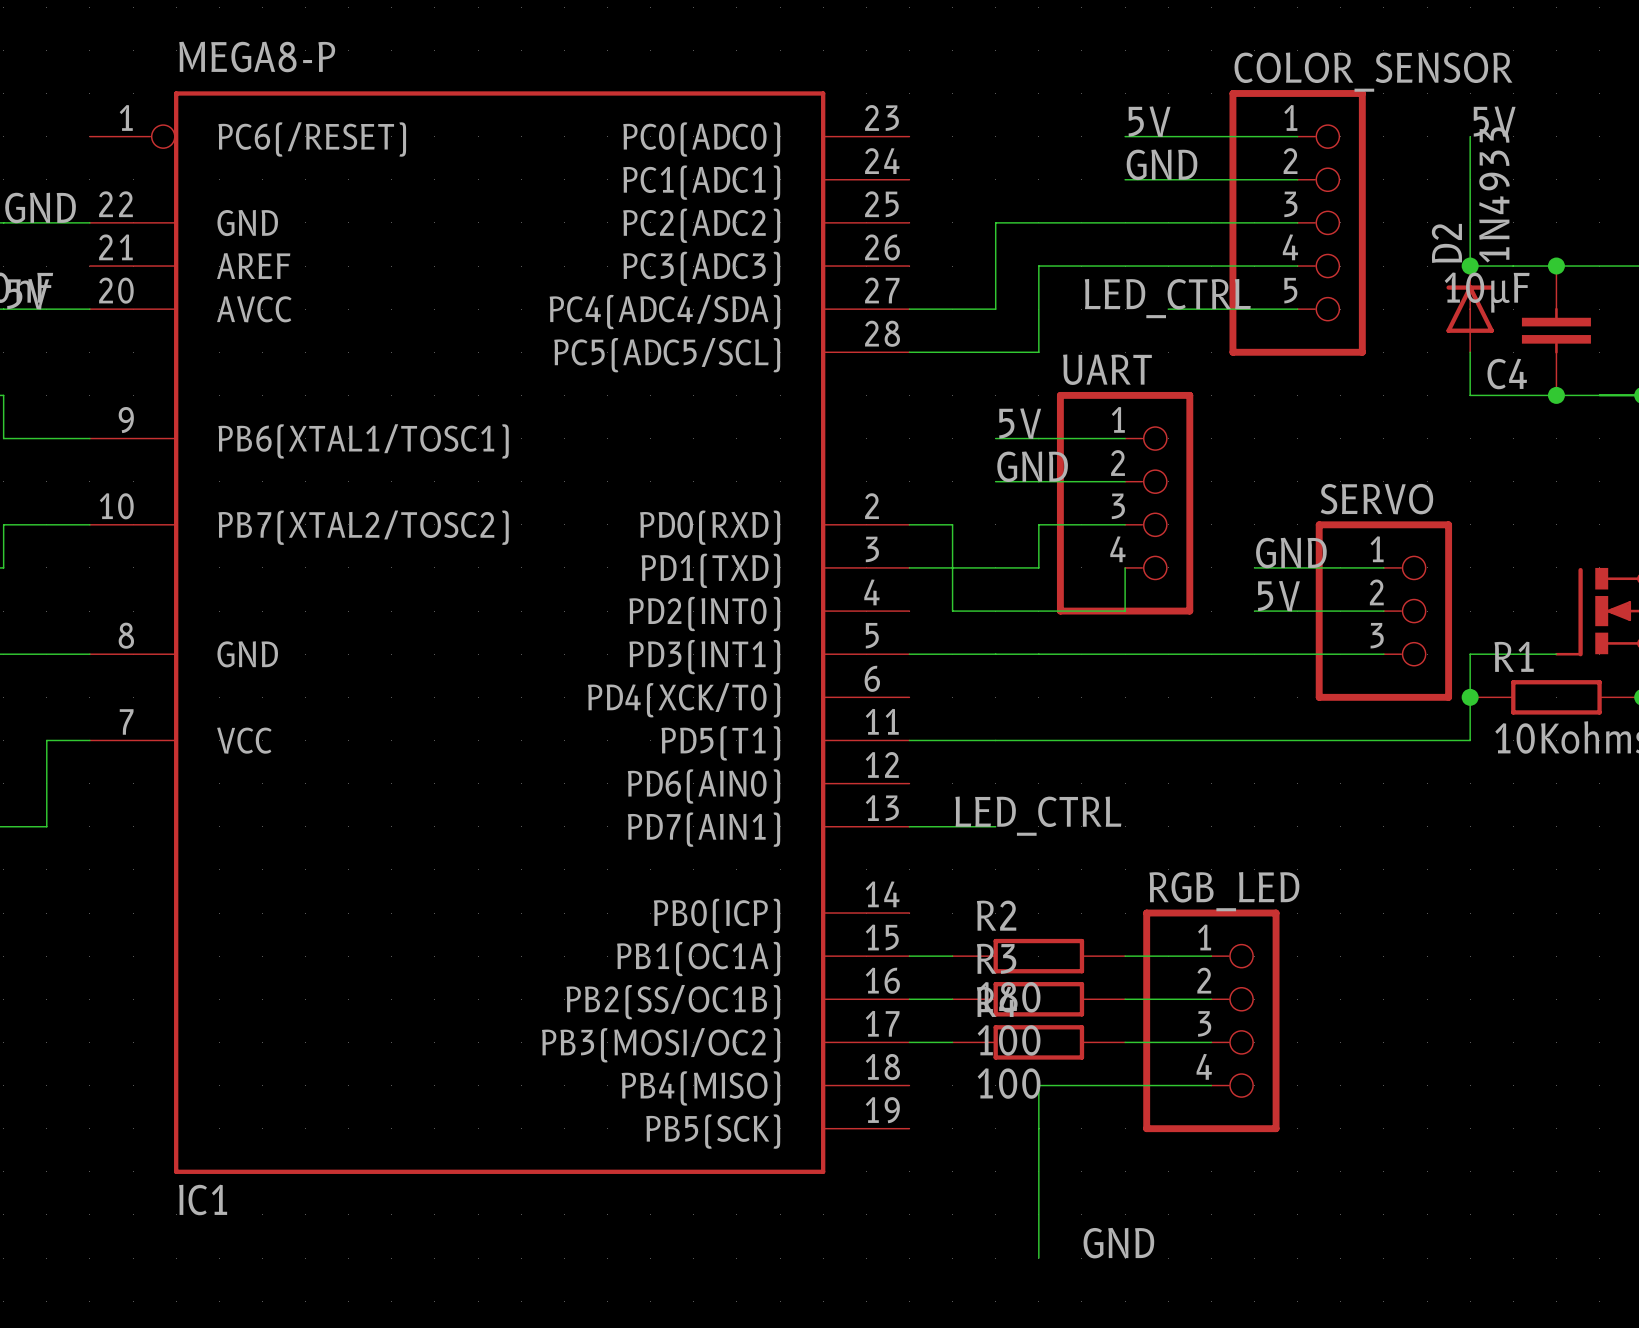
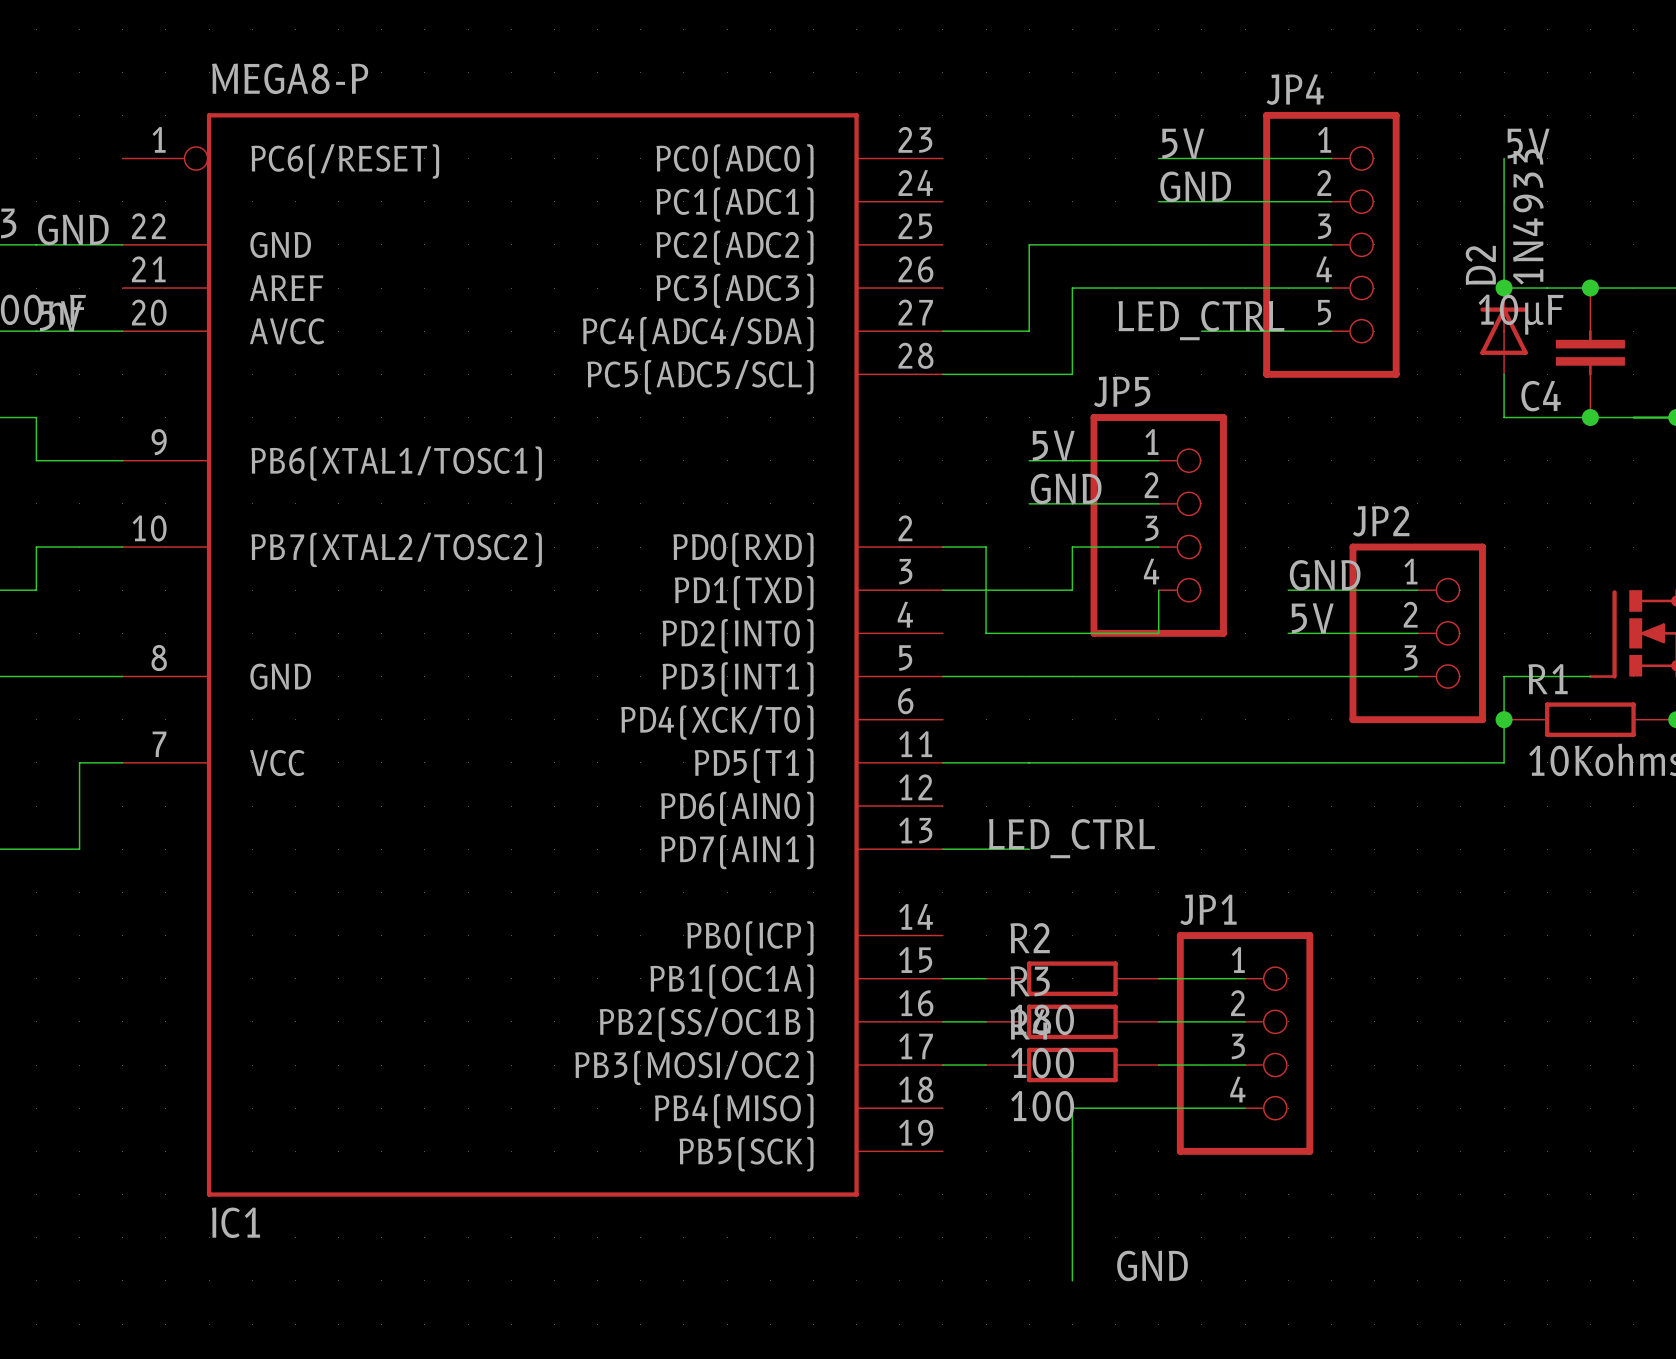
COLOR_SENSOR name: COLOR_SENSOR (1373, 72) -> JP4 (1295, 89)
UART name: UART (1107, 369) -> JP5 (1122, 391)
SERVO name: SERVO (1376, 499) -> JP2 (1381, 521)
RGB_LED name: RGB_LED (1224, 891) -> JP1 (1208, 909)

